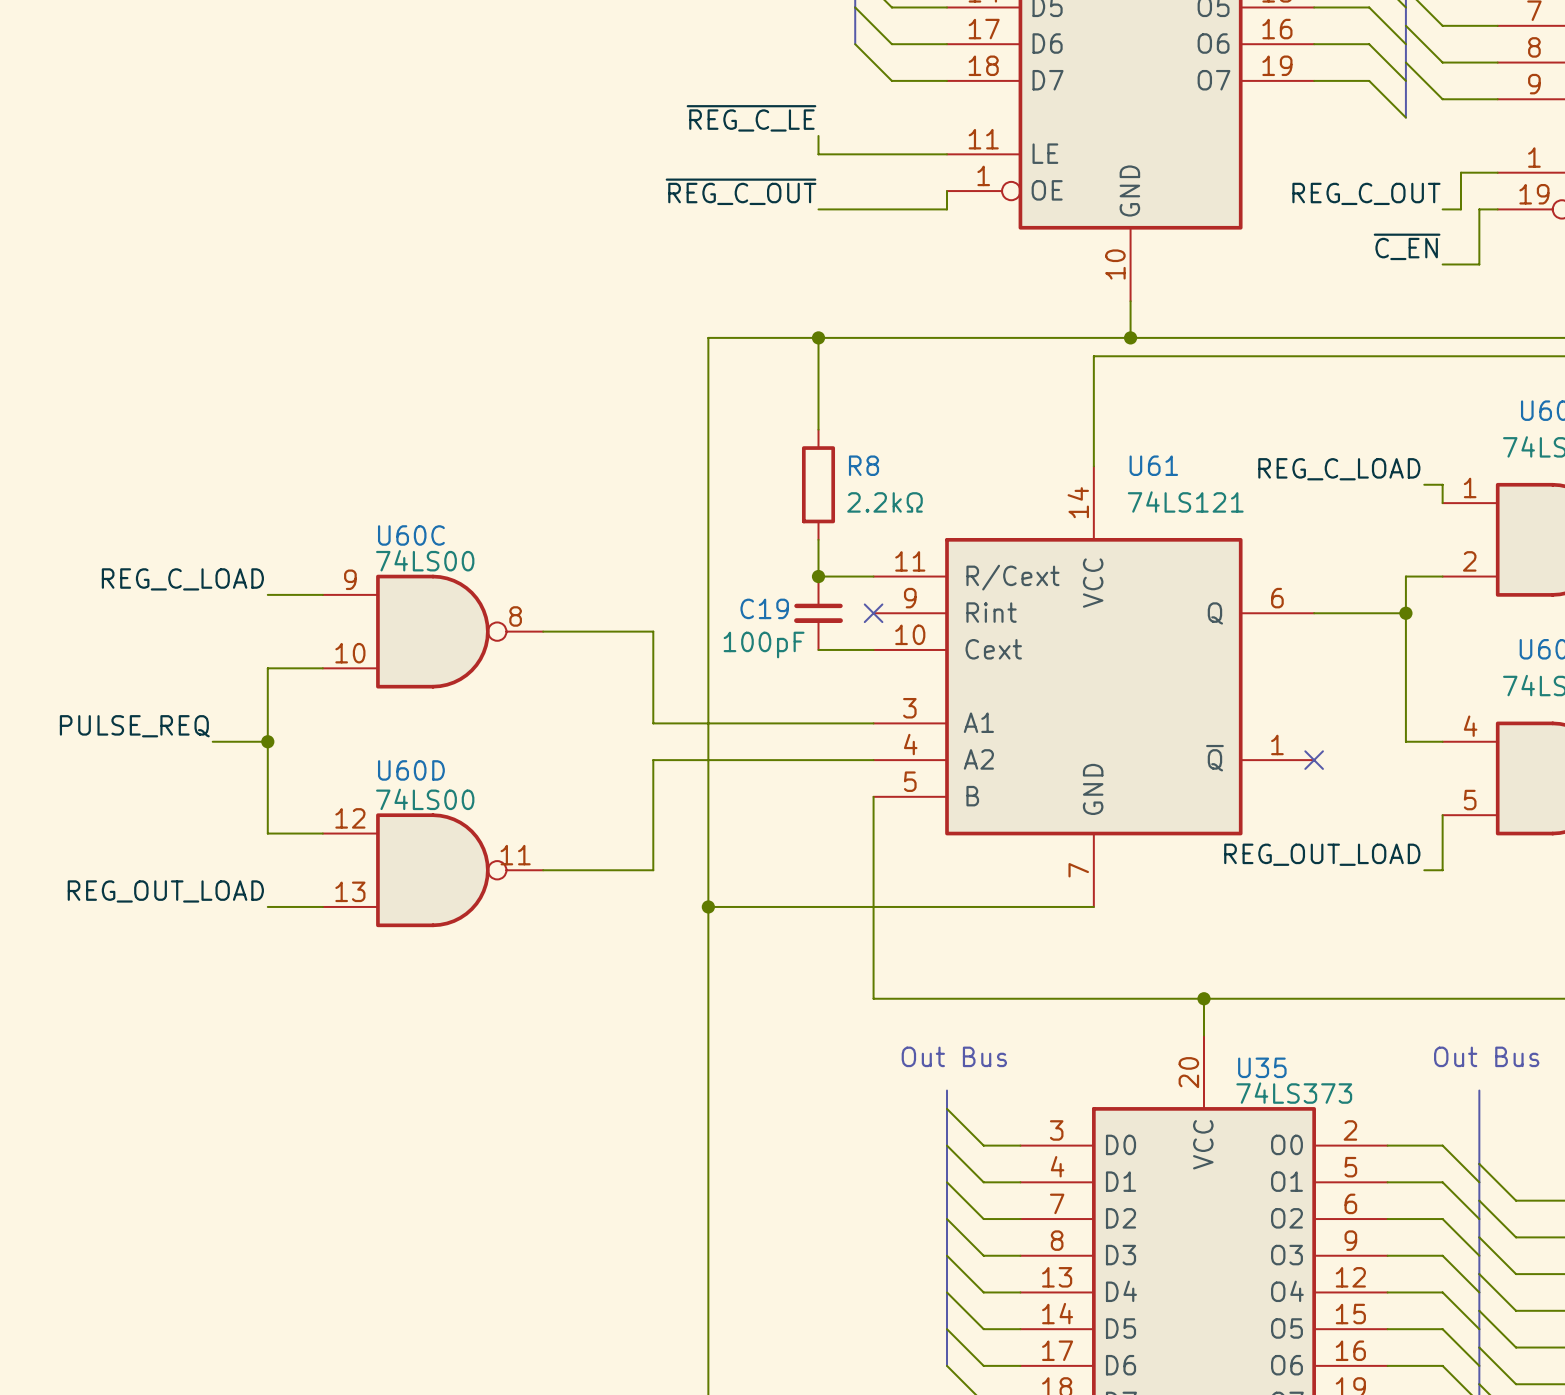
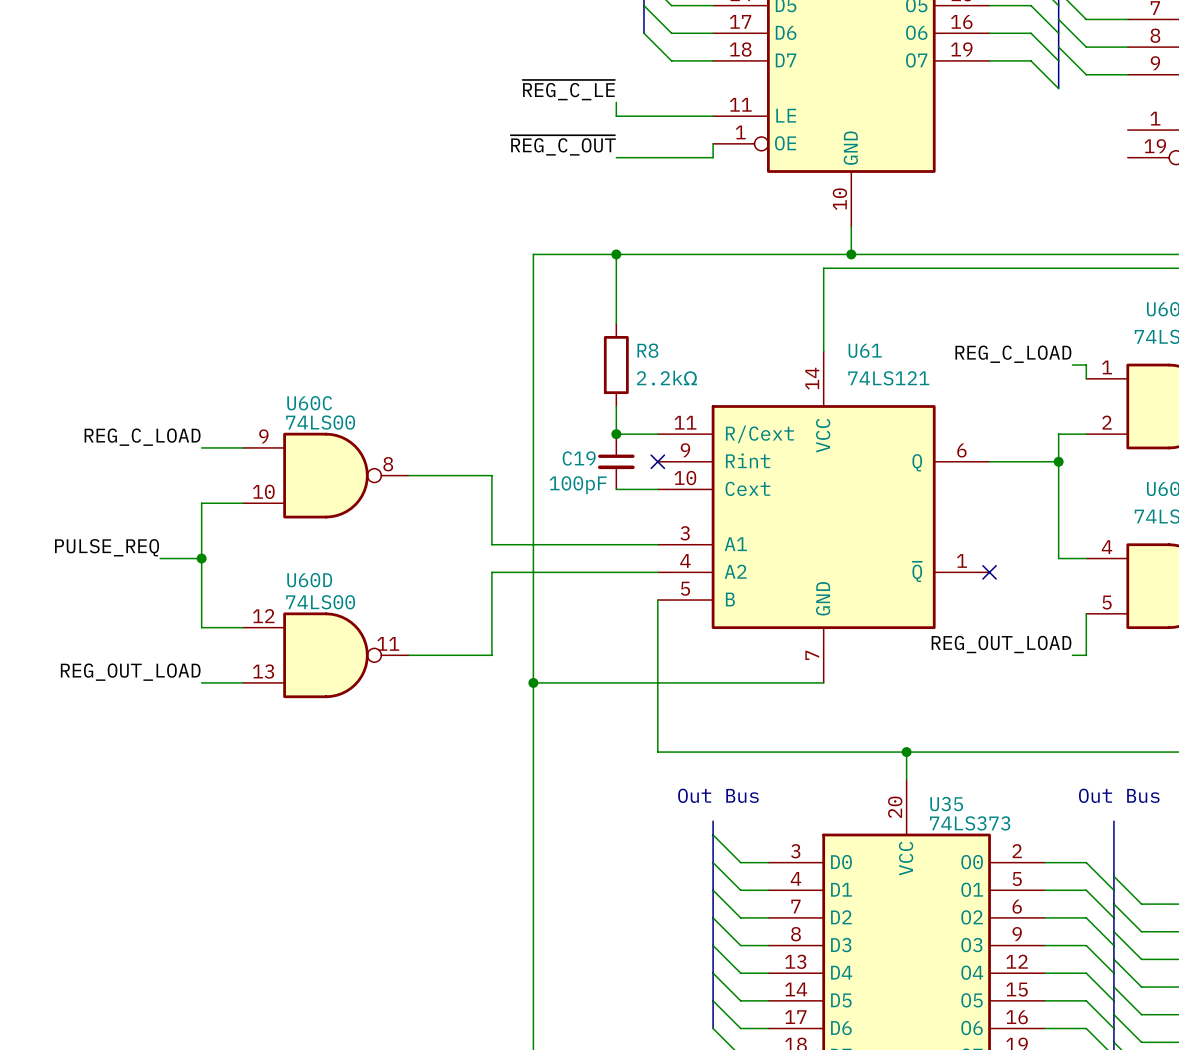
wire: (1497, 172) (1460, 172) (1460, 209) (1442, 209) -> none
label: REG_C_OUT (1366, 193) -> none
wire: (1497, 209) (1479, 209) (1479, 264) (1442, 264) -> none
label: ~{C_EN} (1407, 246) -> none

